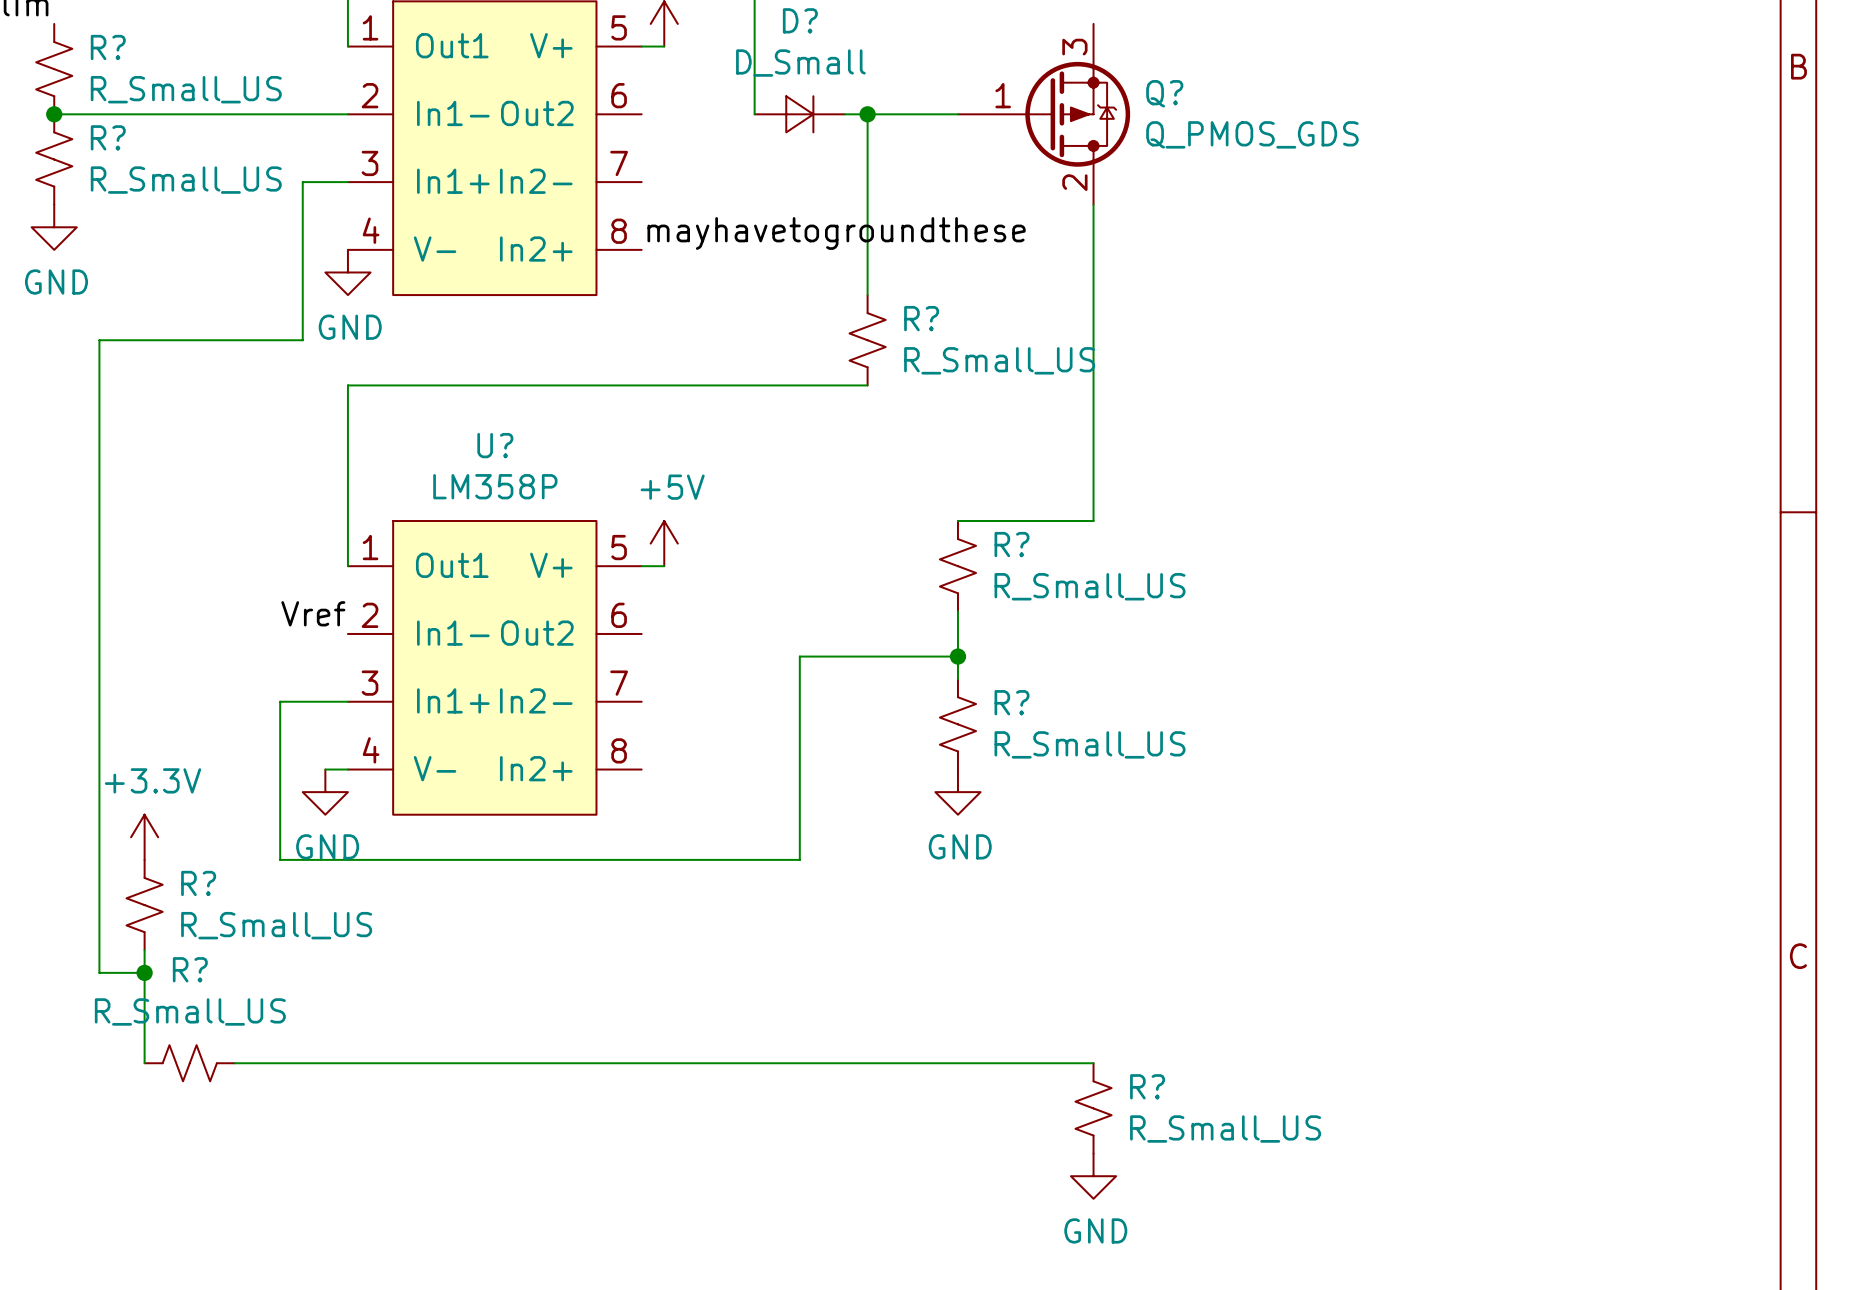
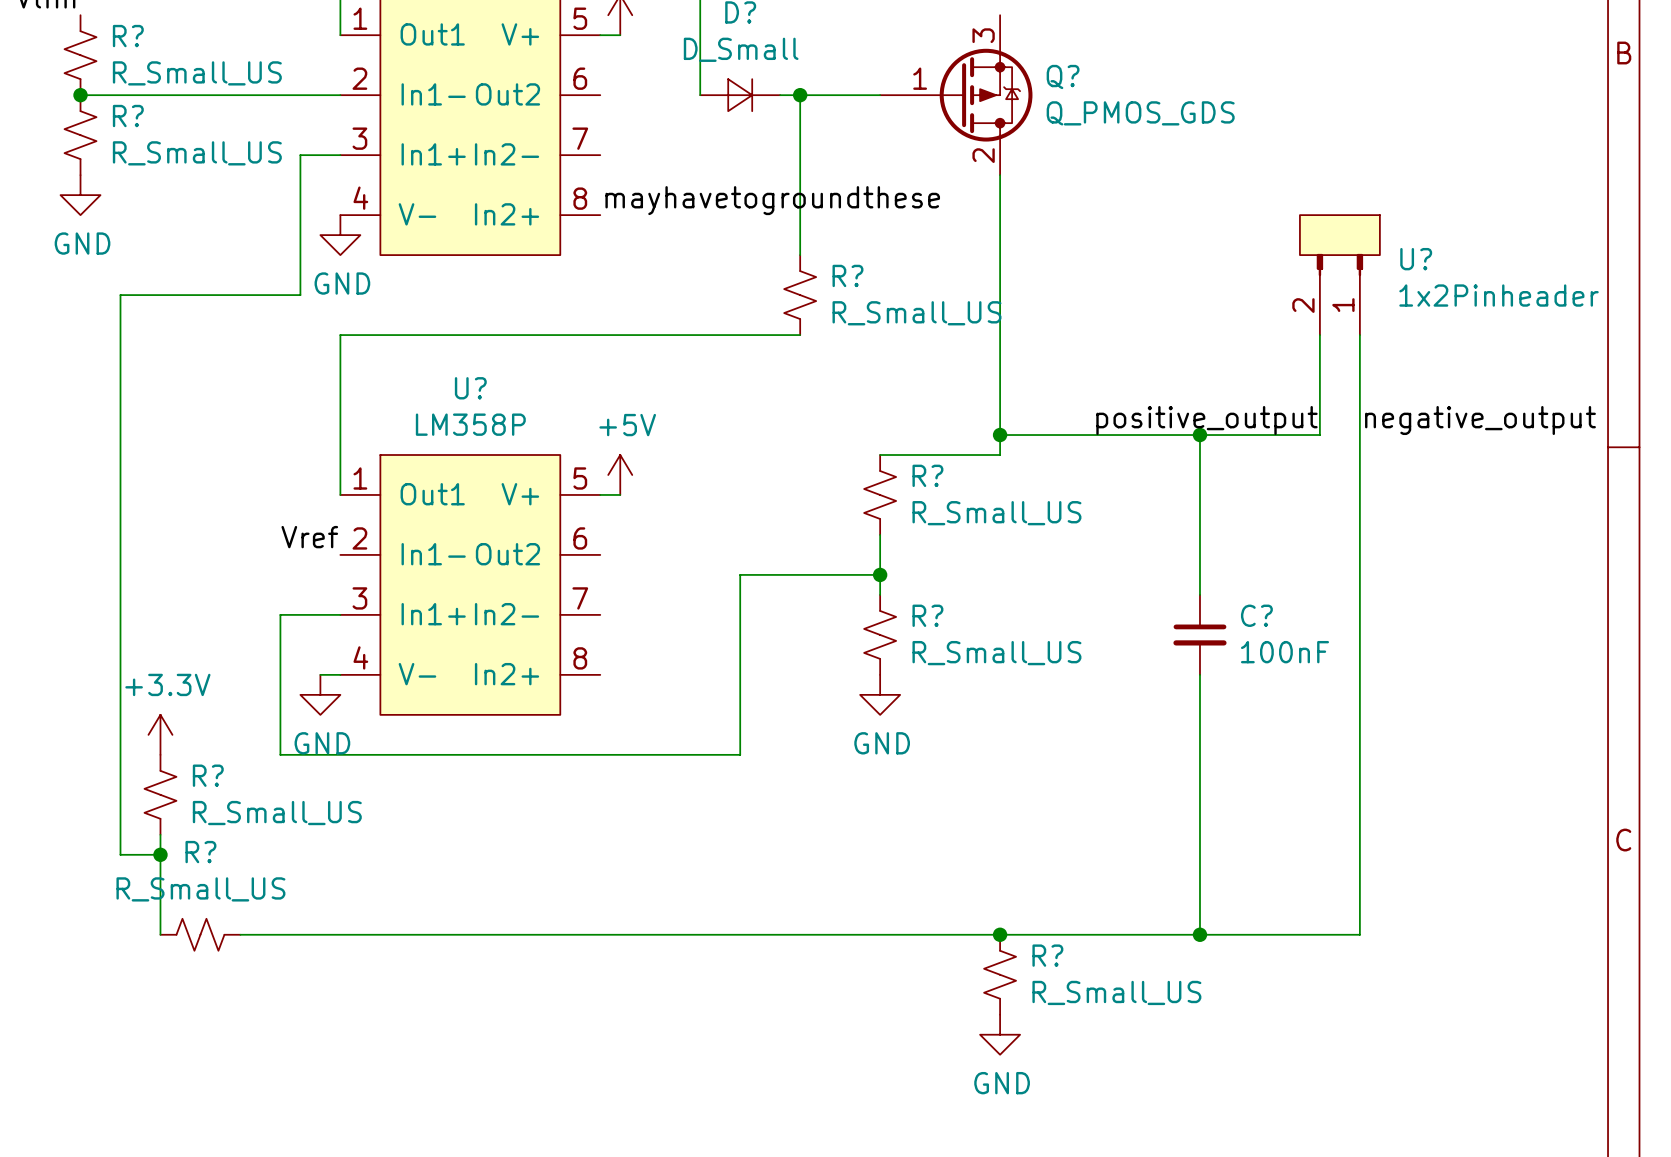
U?: none -> 1x2Pinheader (1339, 275)
wire: none -> (1319, 335) (1319, 435) (1000, 435)
wire: none -> (1359, 335) (1359, 934) (1000, 934)
label: none -> positive_output (1206, 420)
label: none -> negative_output (1480, 420)
junction: none -> (1000, 435)
wire: none -> (1199, 435) (1199, 594)
junction: none -> (1199, 435)
C?: none -> 100nF (1199, 634)
wire: none -> (1199, 674) (1199, 934)
junction: none -> (1000, 934)
junction: none -> (1199, 934)

